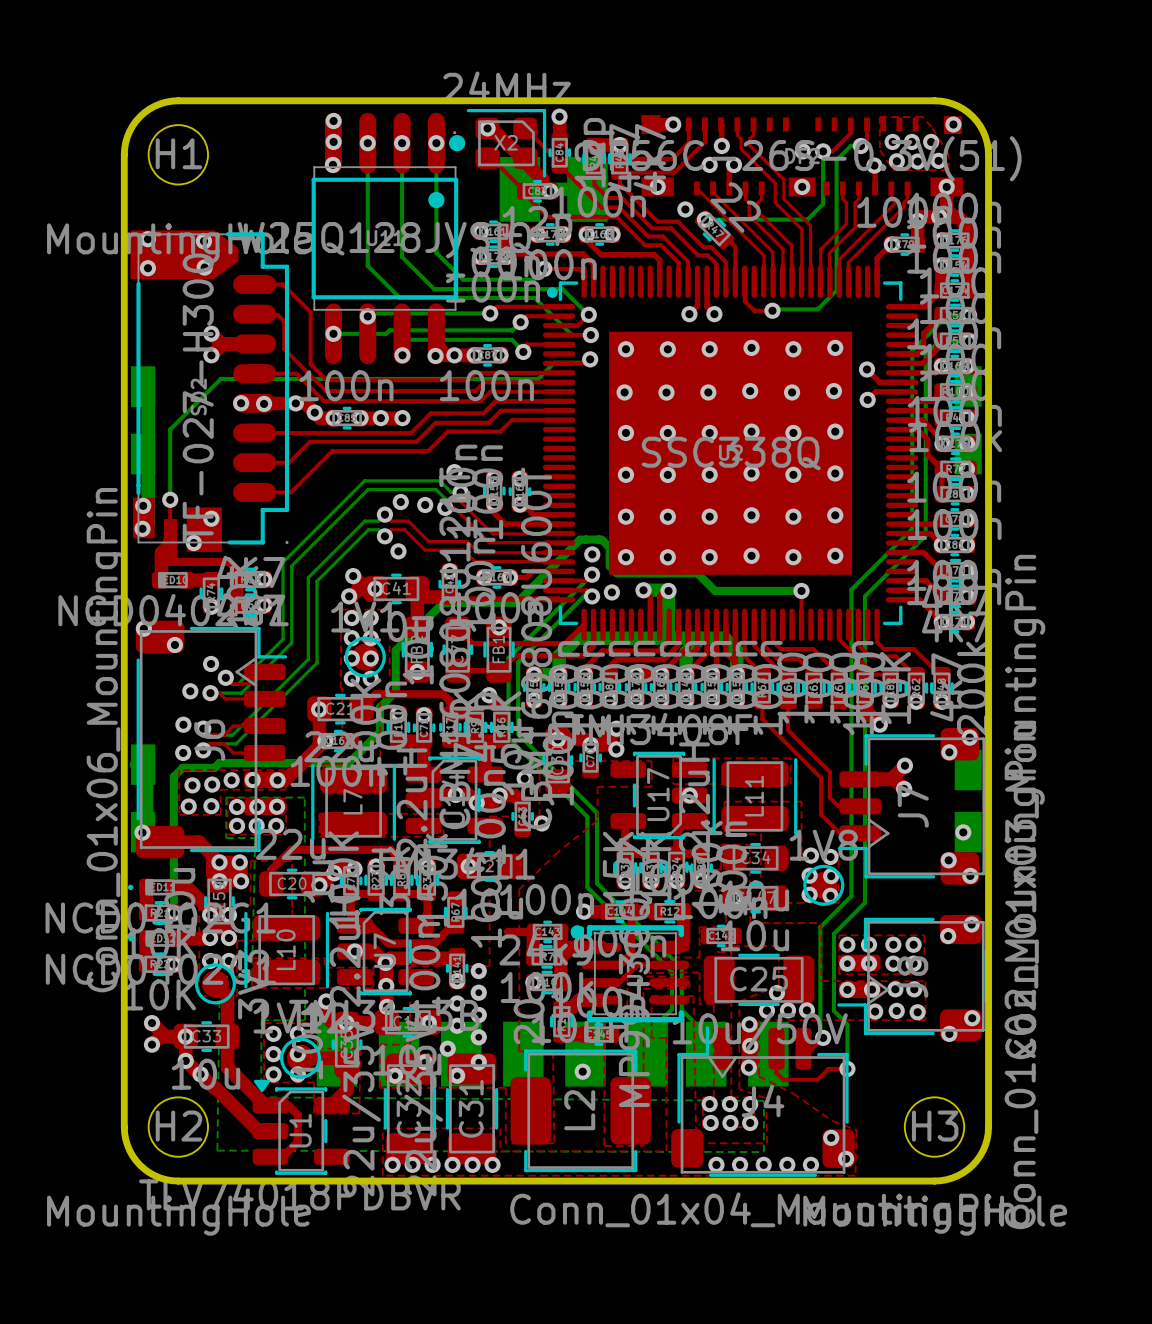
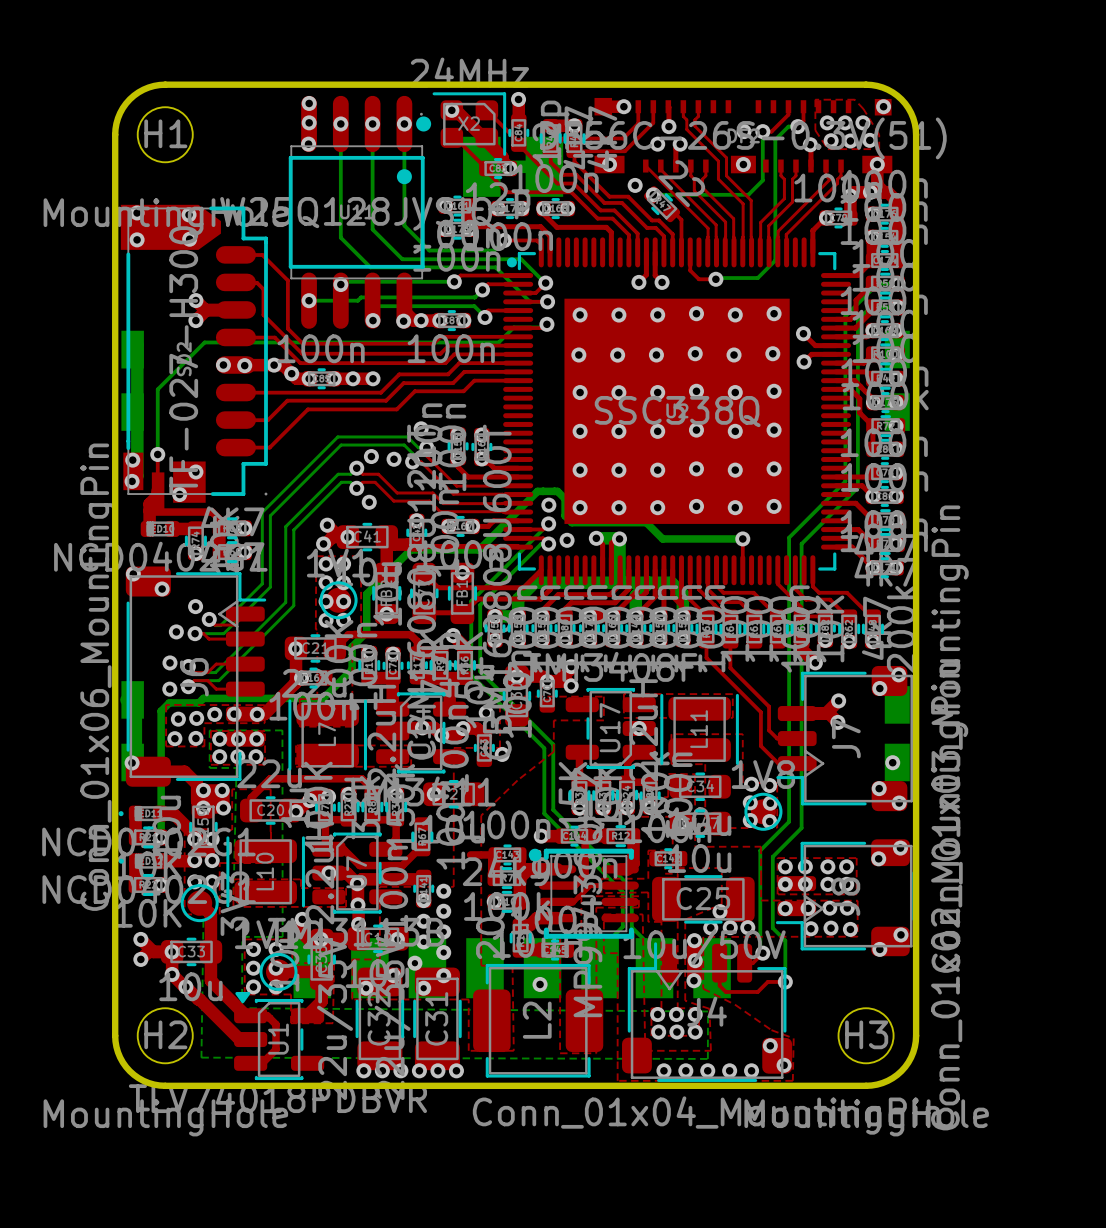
top zone outline: (666, 1151) (500, 1151) (500, 1128) (382, 1128) (382, 1175) (666, 1175) -> (617, 1058) (617, 1080)

